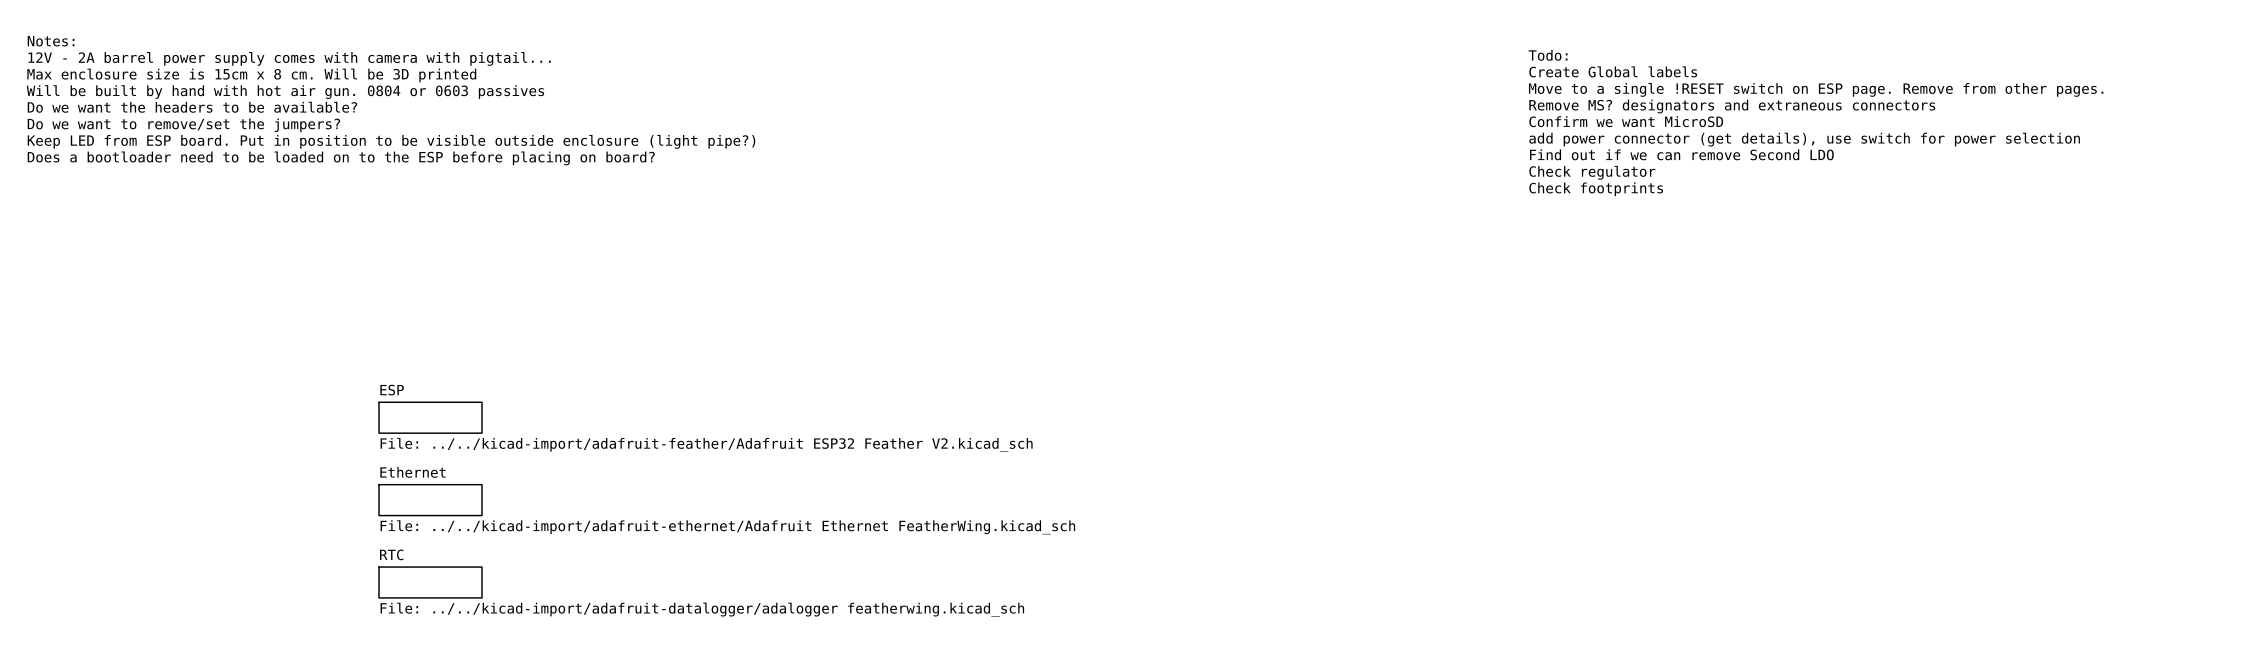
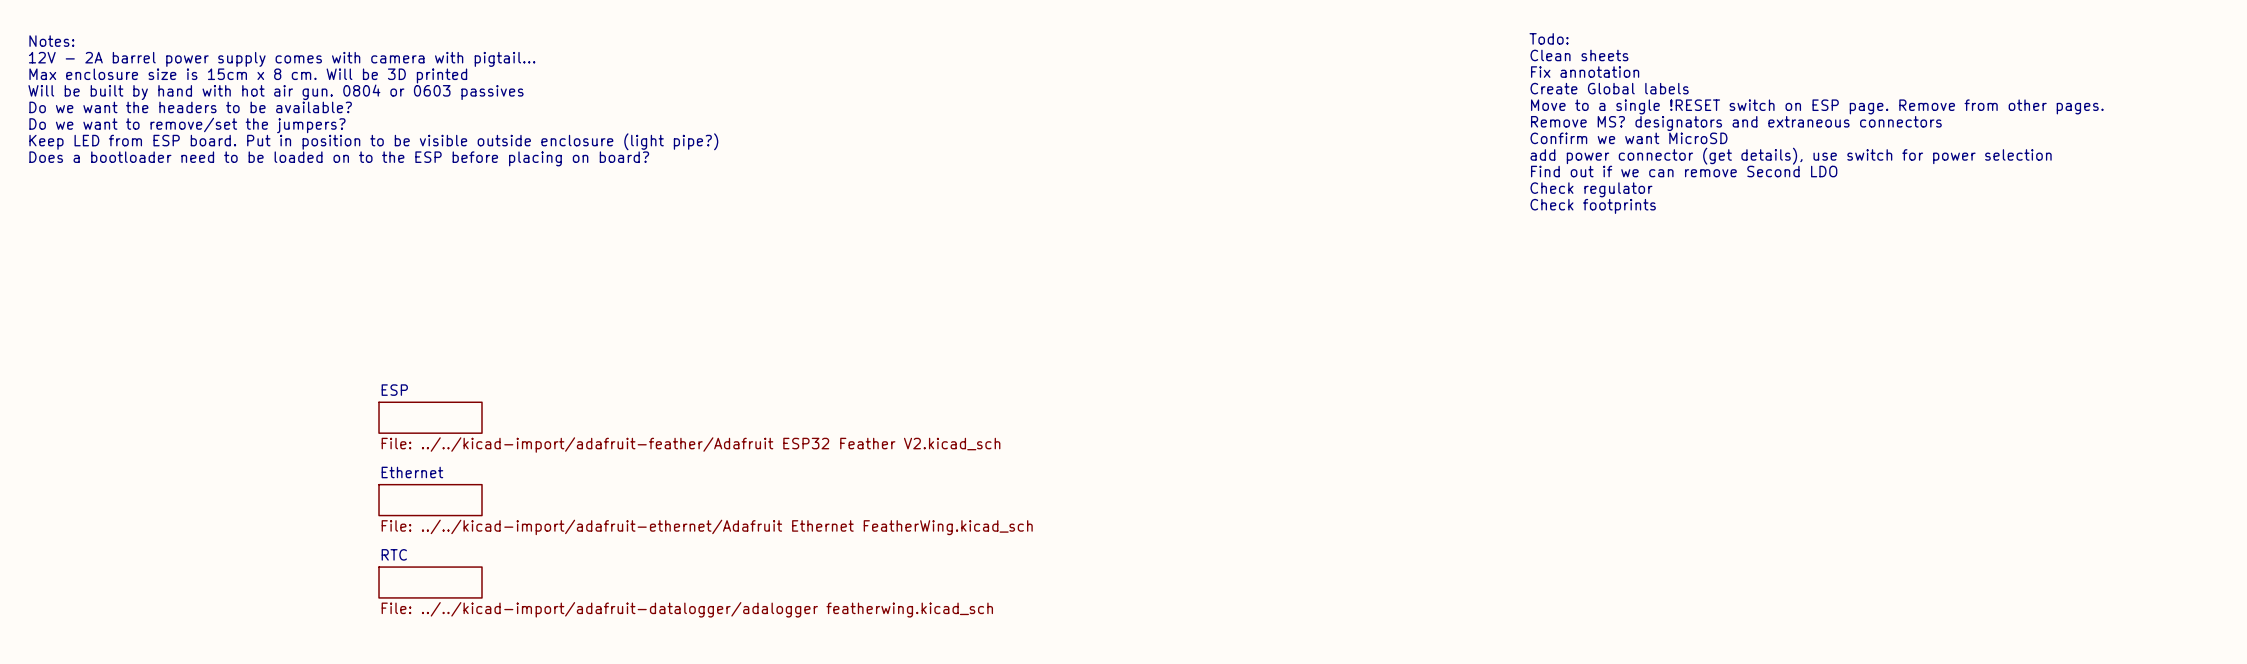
text: none -> Todo: (1549, 38)
text: Todo: (1548, 55) -> Clean sheets (1579, 55)
text: Create Global labels (1613, 71) -> Fix annotation (1585, 72)
text: Move to a single !RESET switch on ESP page. Remove from other pages. (1816, 89) -> Create Global labels (1609, 88)
text: Remove MS? designators and extraneous connectors (1732, 106) -> Move to a single !RESET switch on ESP page. Remove from other pages. (1817, 106)
text: Confirm we want MicroSD (1626, 121) -> Remove MS? designators and extraneous connectors (1736, 123)
text: add power connector (get details), use switch for power selection (1804, 139) -> Confirm we want MicroSD (1628, 138)
text: Find out if we can remove Second LDO (1681, 154) -> add power connector (get details), use switch for power selection (1791, 156)
text: Check regulator (1592, 172) -> Find out if we can remove Second LDO (1684, 171)
text: Check footprints (1596, 189) -> Check regulator (1591, 189)
text: none -> Check footprints (1593, 206)

